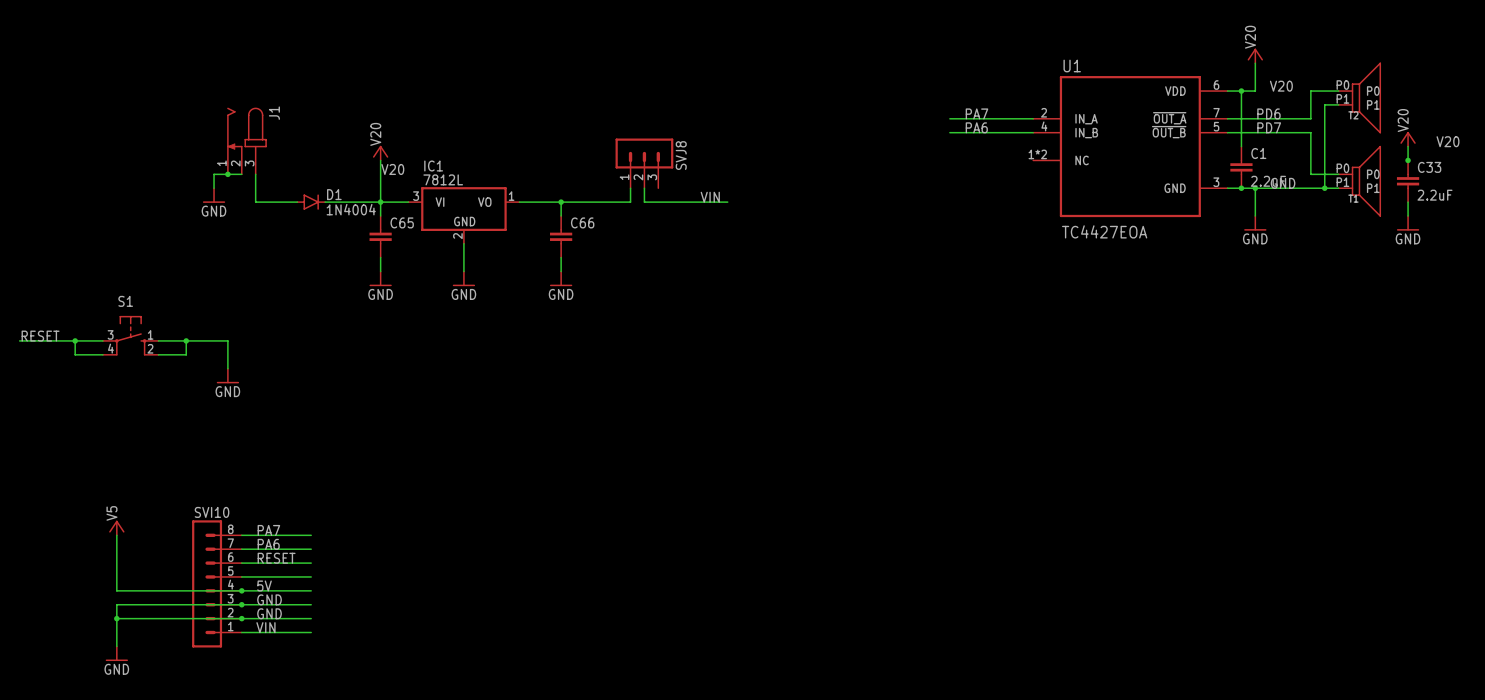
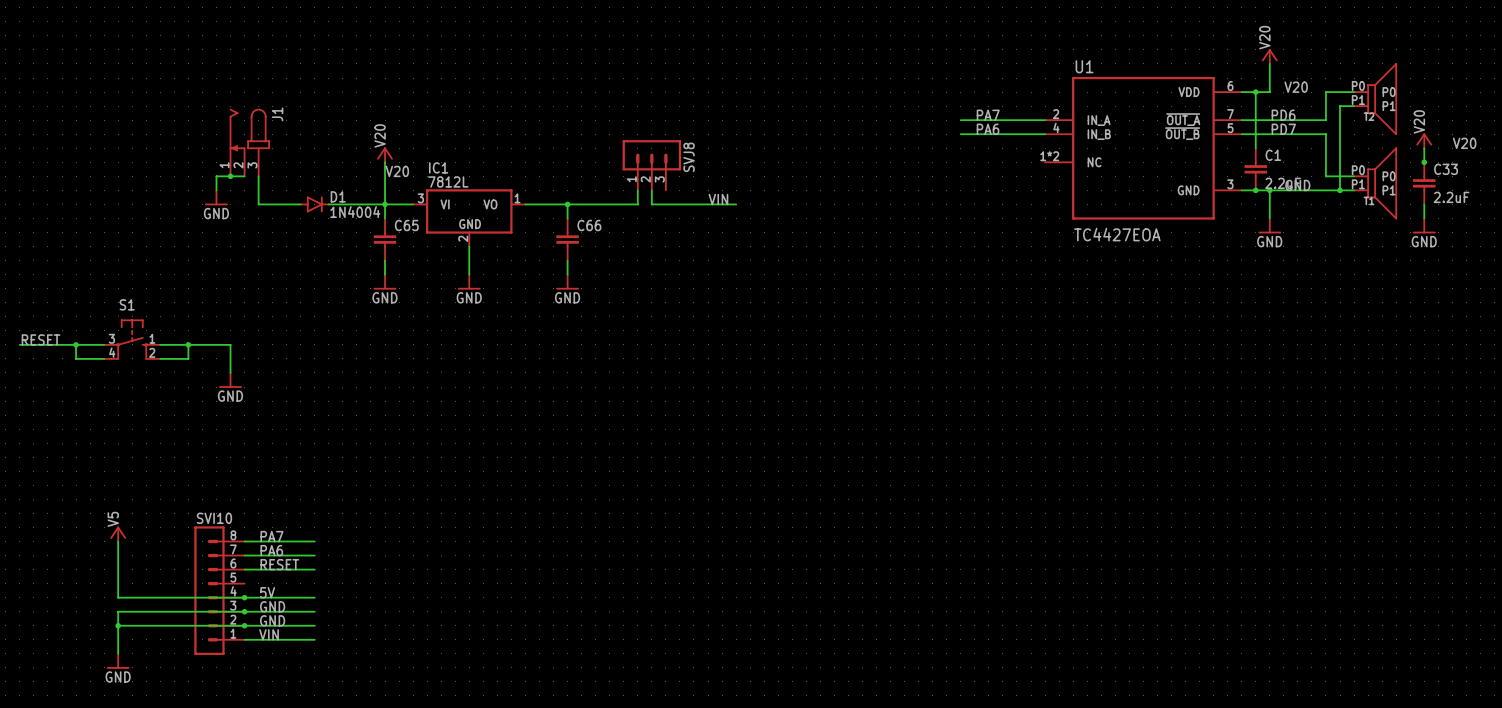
wire: (241, 576) (311, 576) -> none

